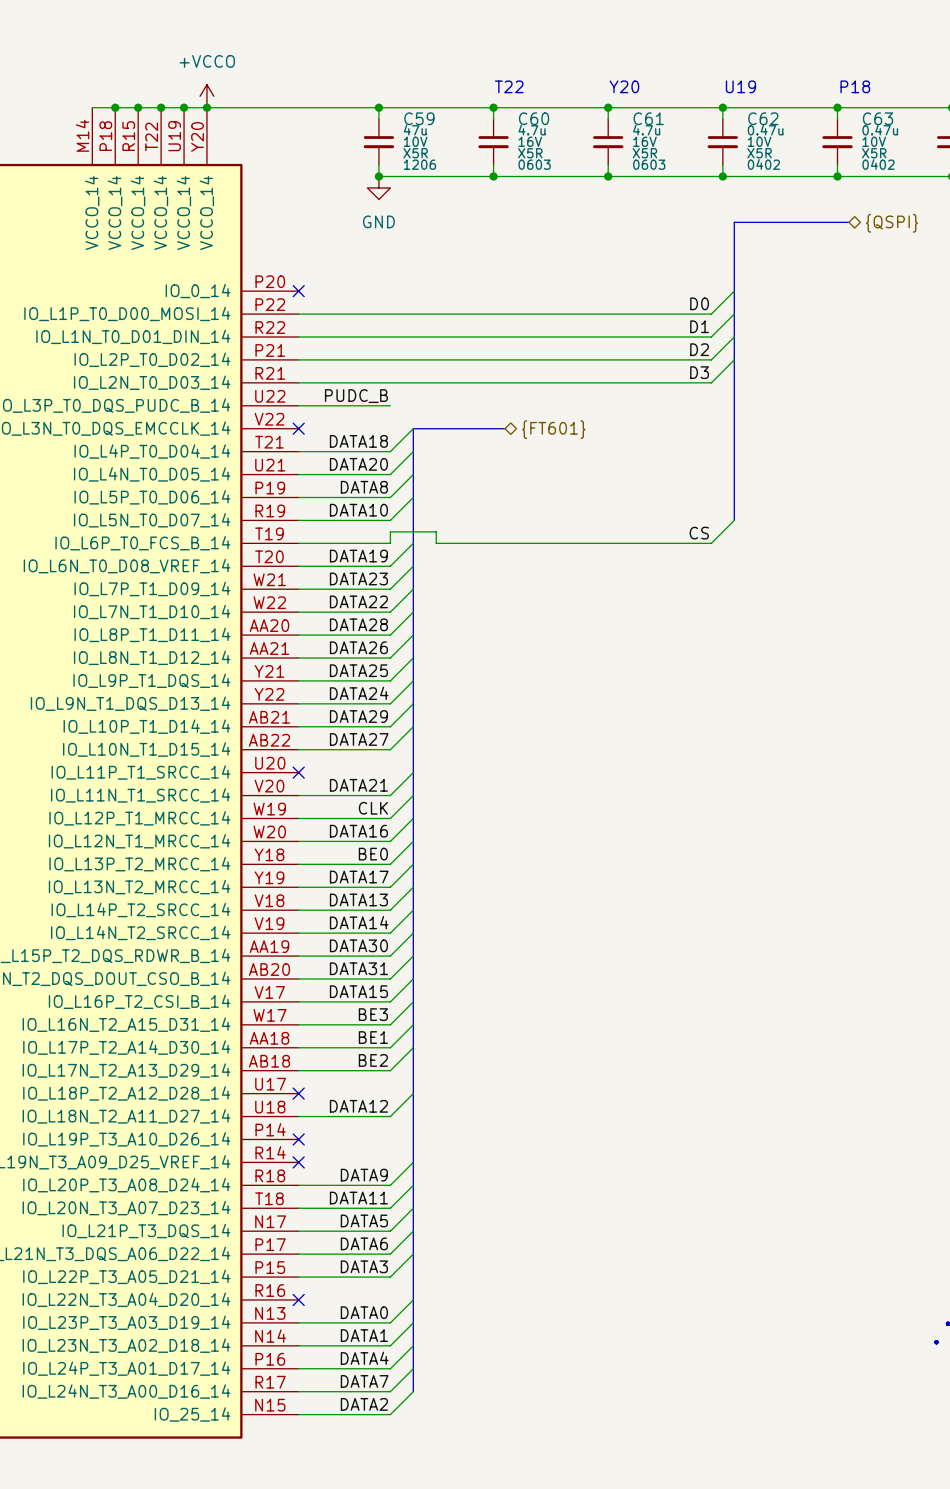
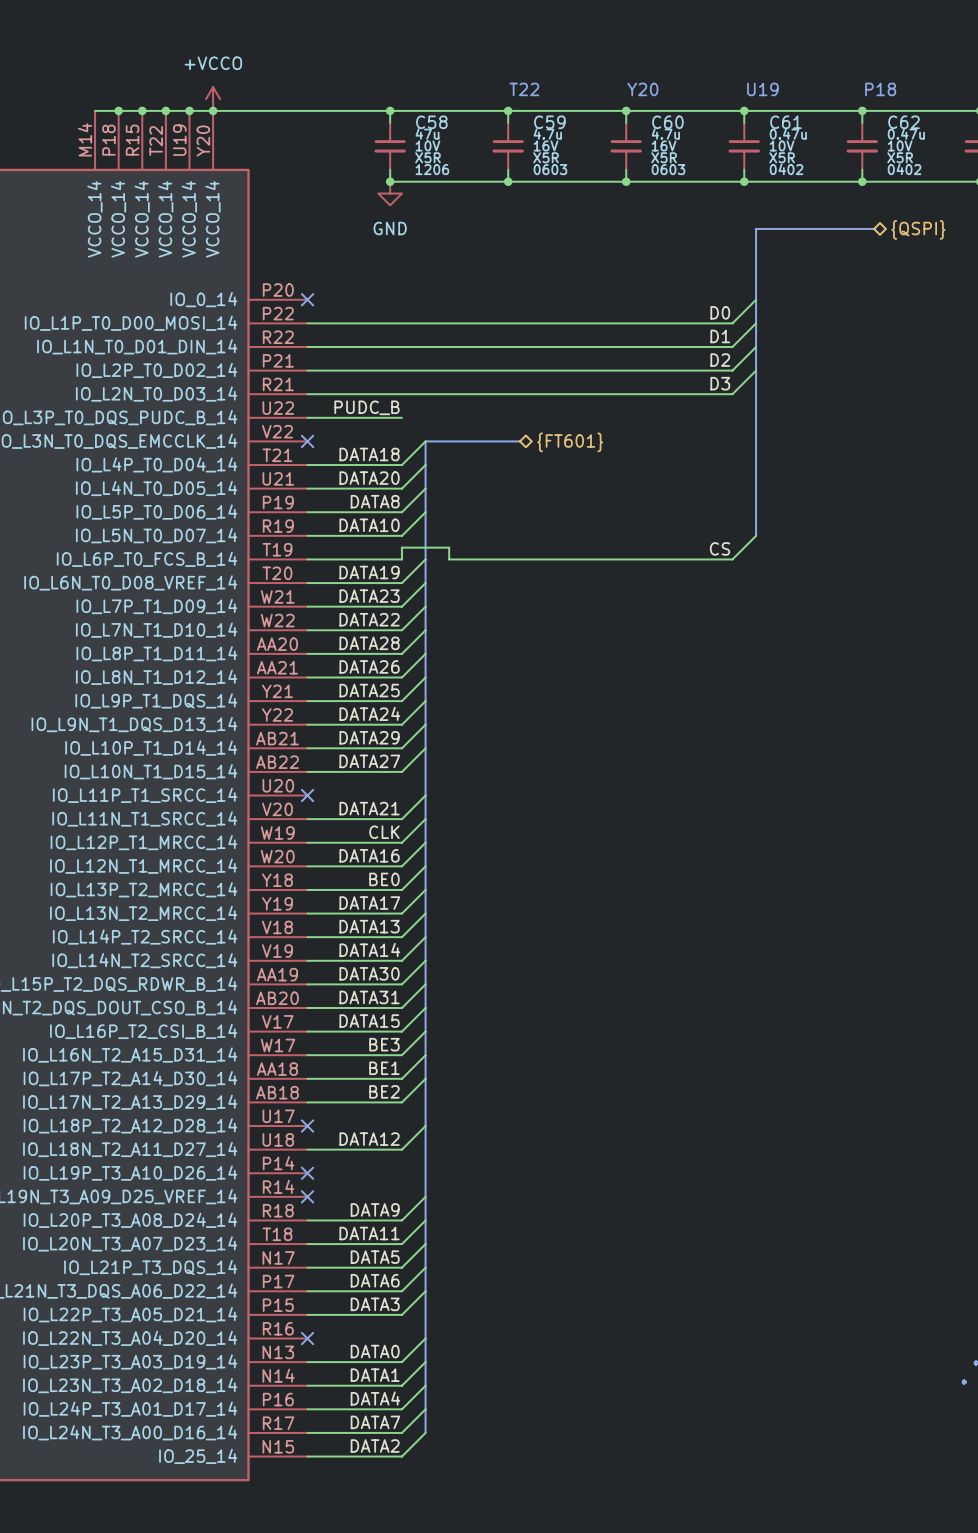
C59 name: C59 (419, 118) -> C58 (431, 122)
C60 name: C60 (534, 118) -> C59 (549, 122)
C61 name: C61 (648, 118) -> C60 (667, 122)
C62 name: C62 (763, 118) -> C61 (785, 122)
C63 name: C63 (877, 118) -> C62 (903, 122)

